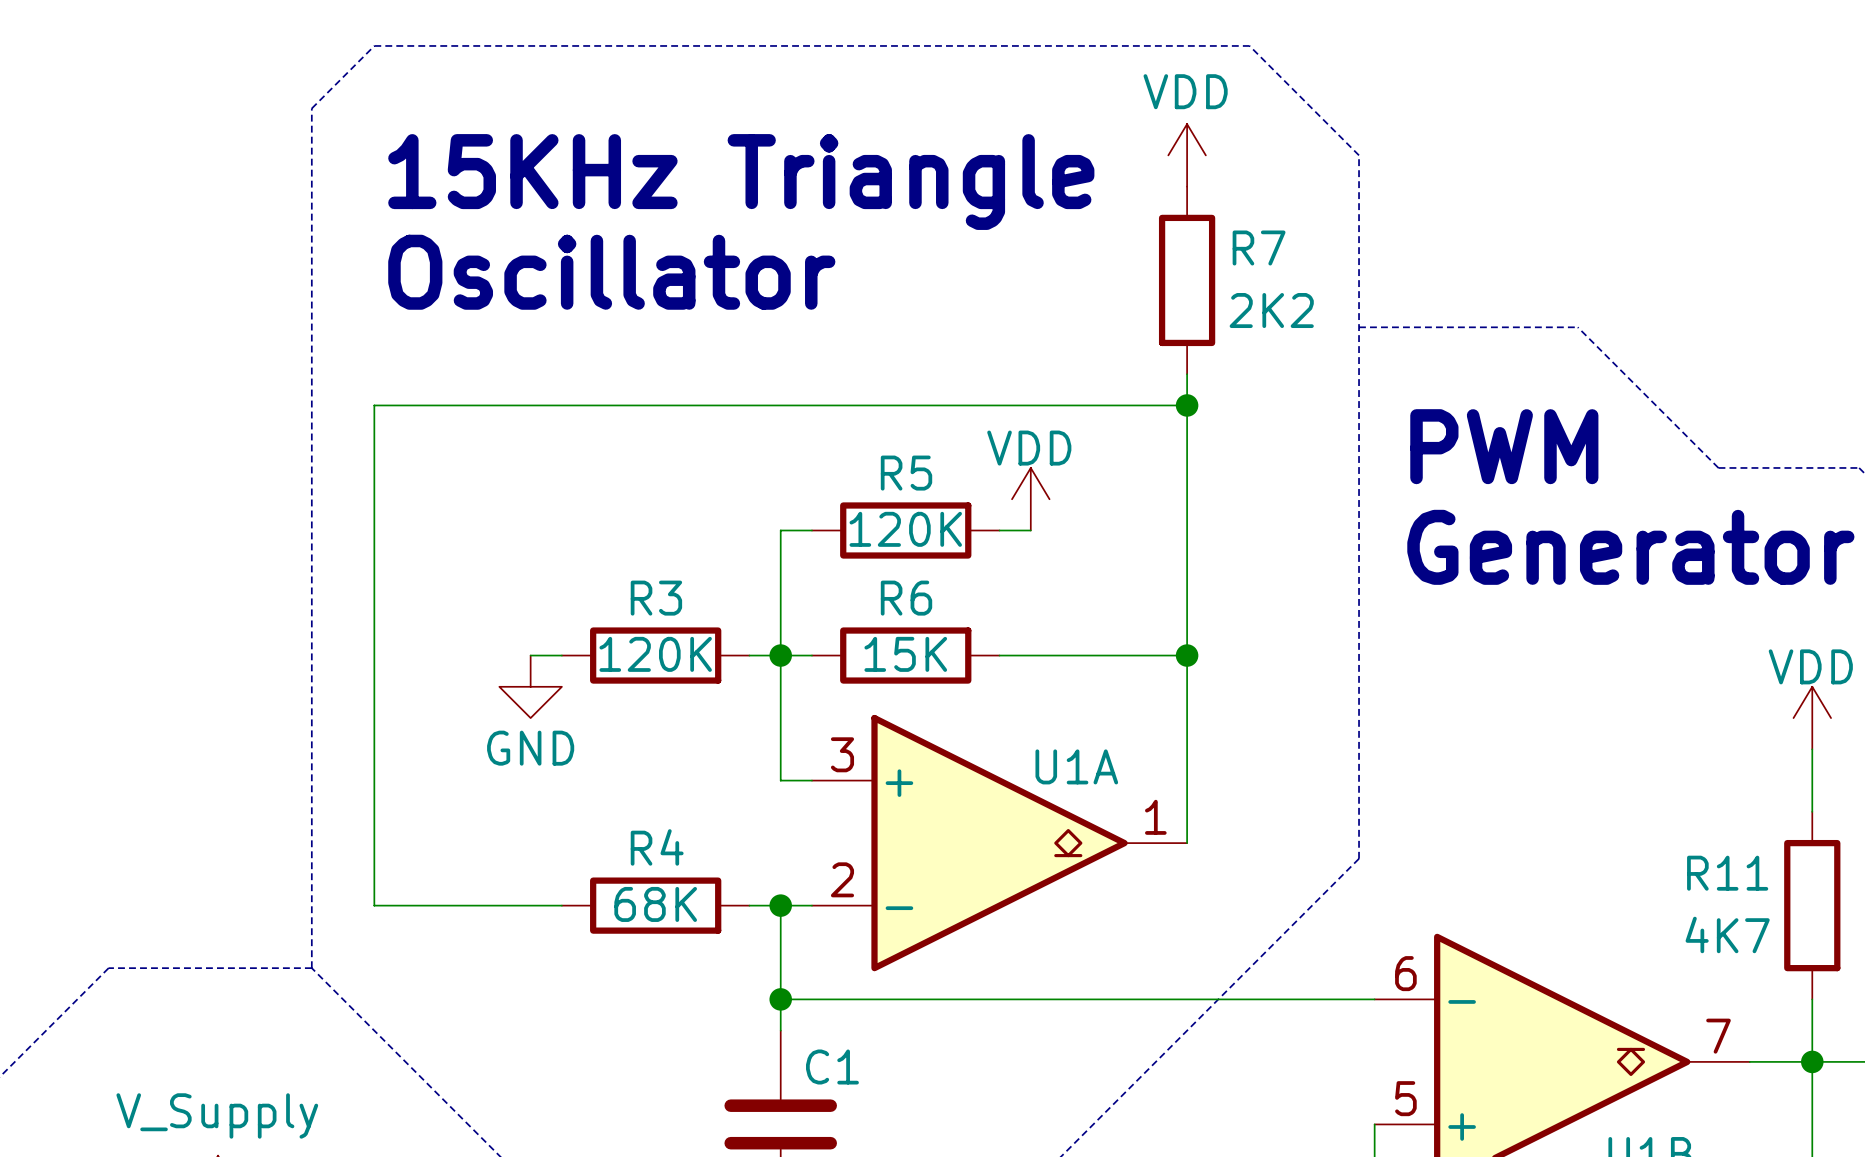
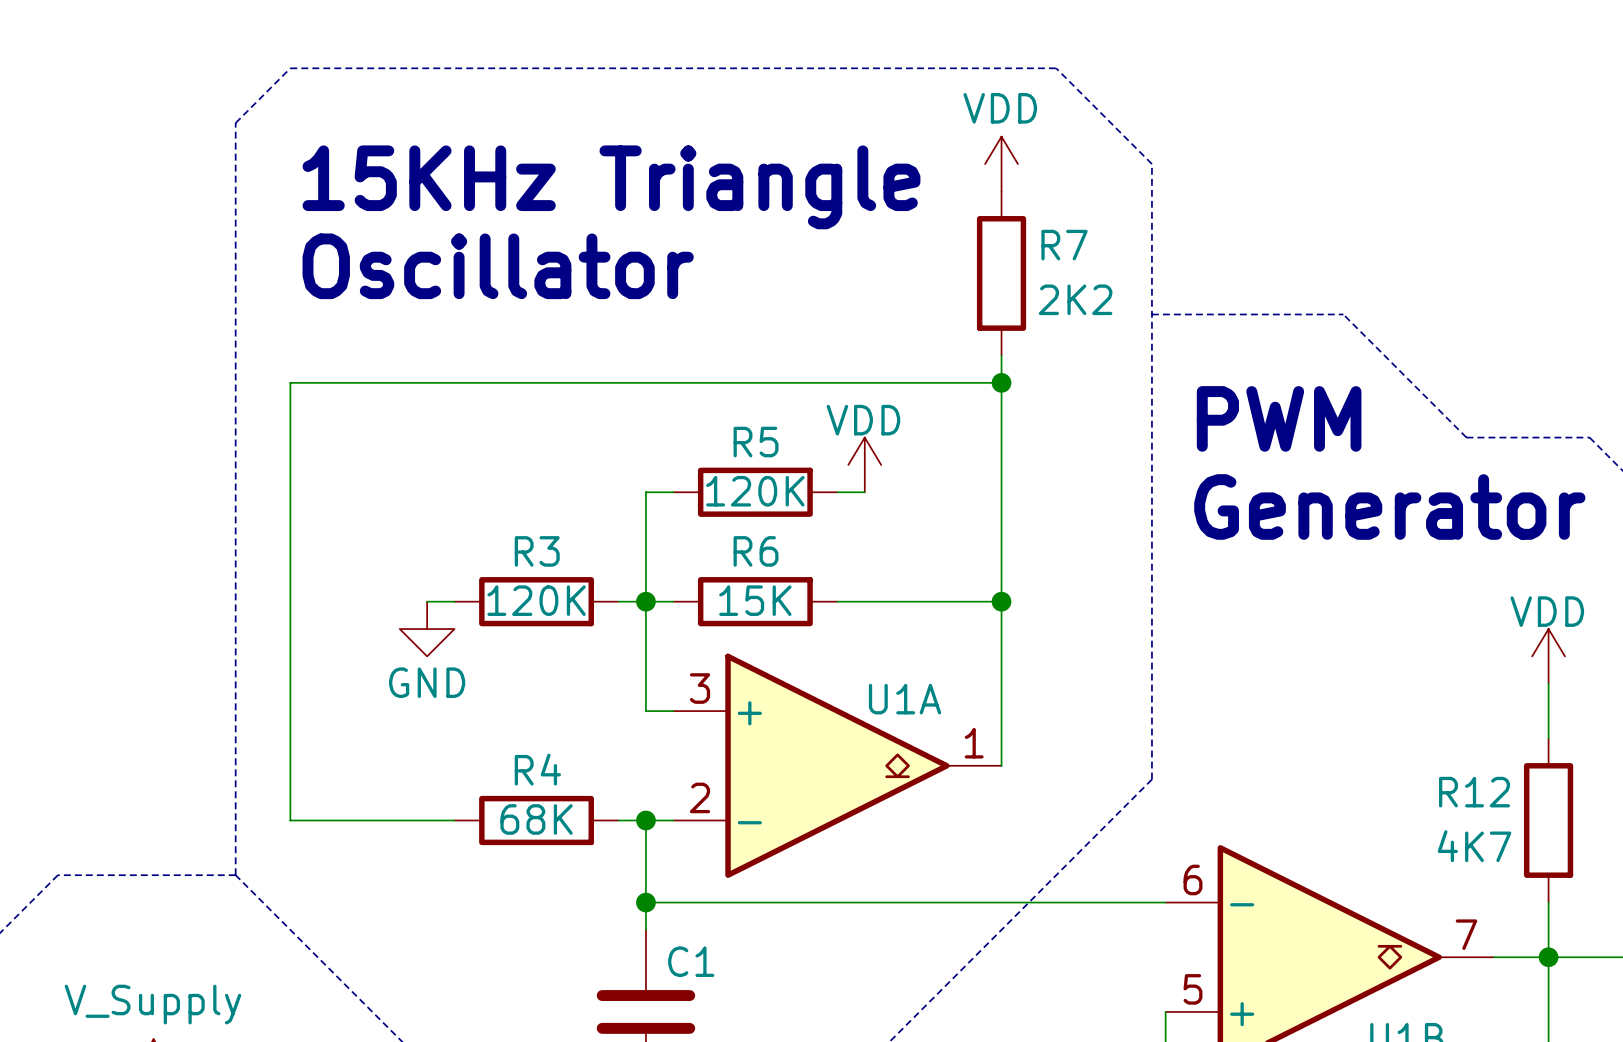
R11 name: R11 (1727, 873) -> R12 (1474, 792)

